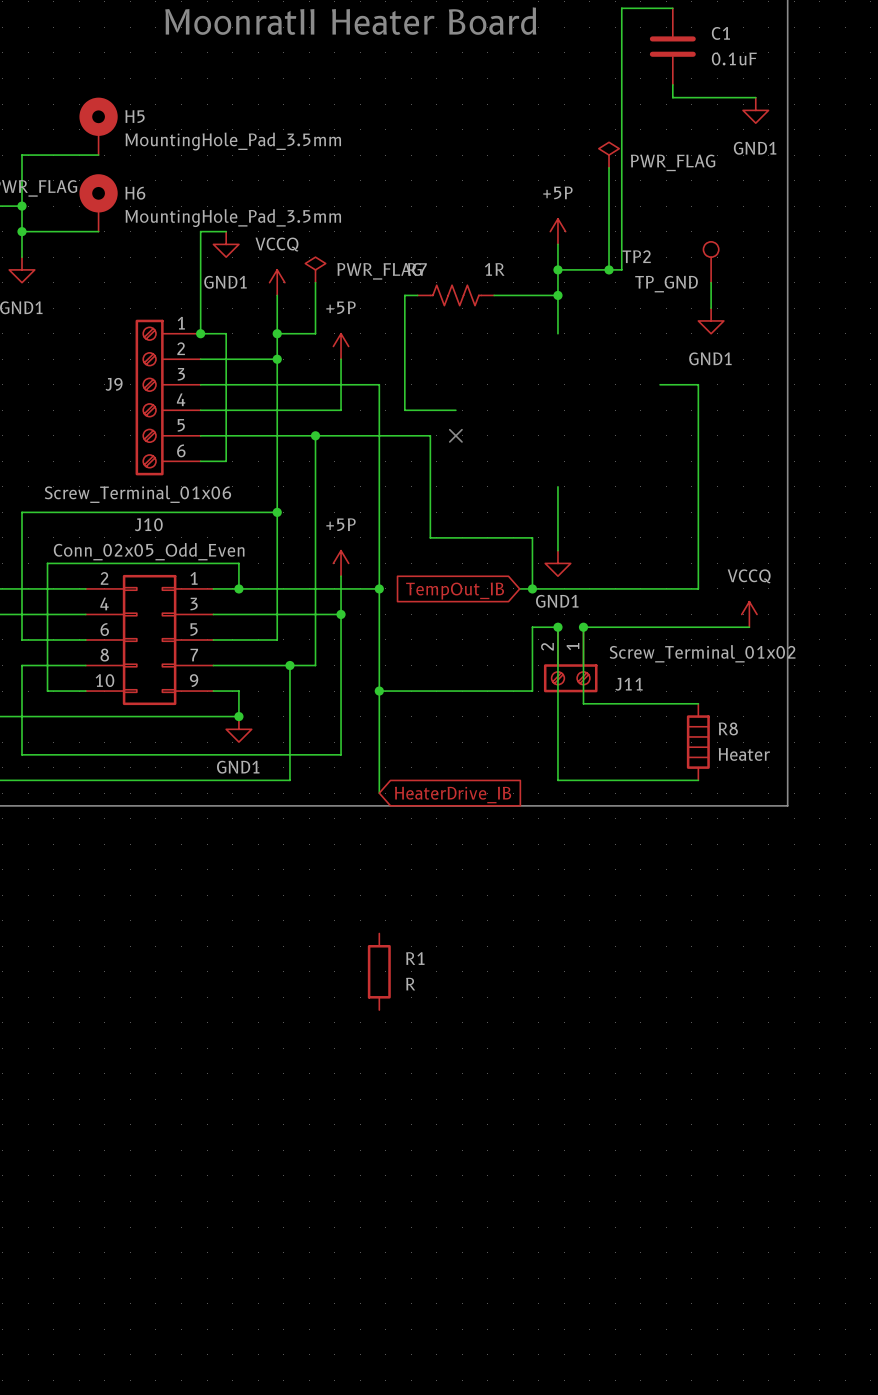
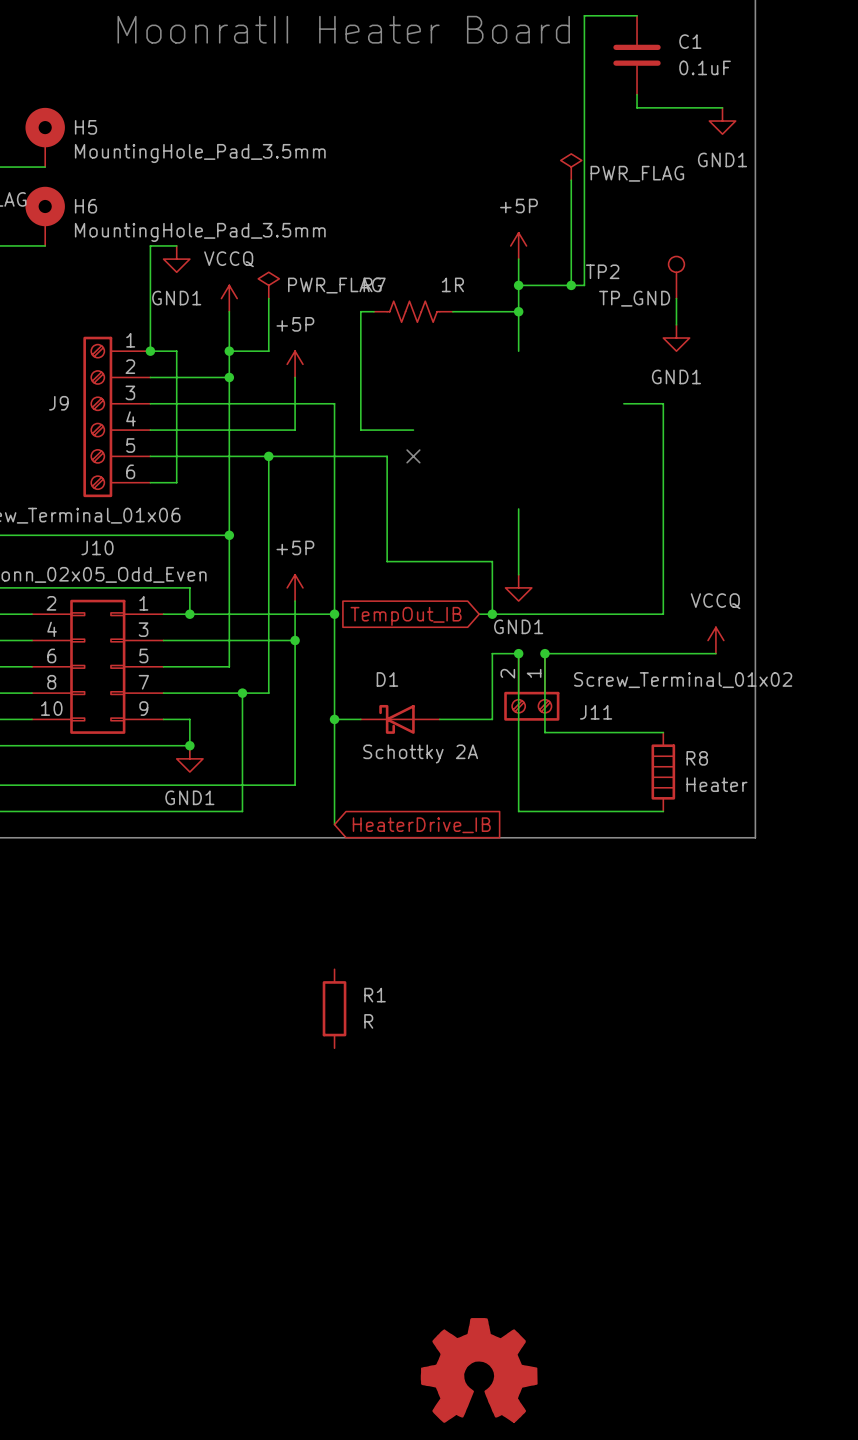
D1: none -> Schottky 2A (400, 719)
part: none -> (479, 1370)

